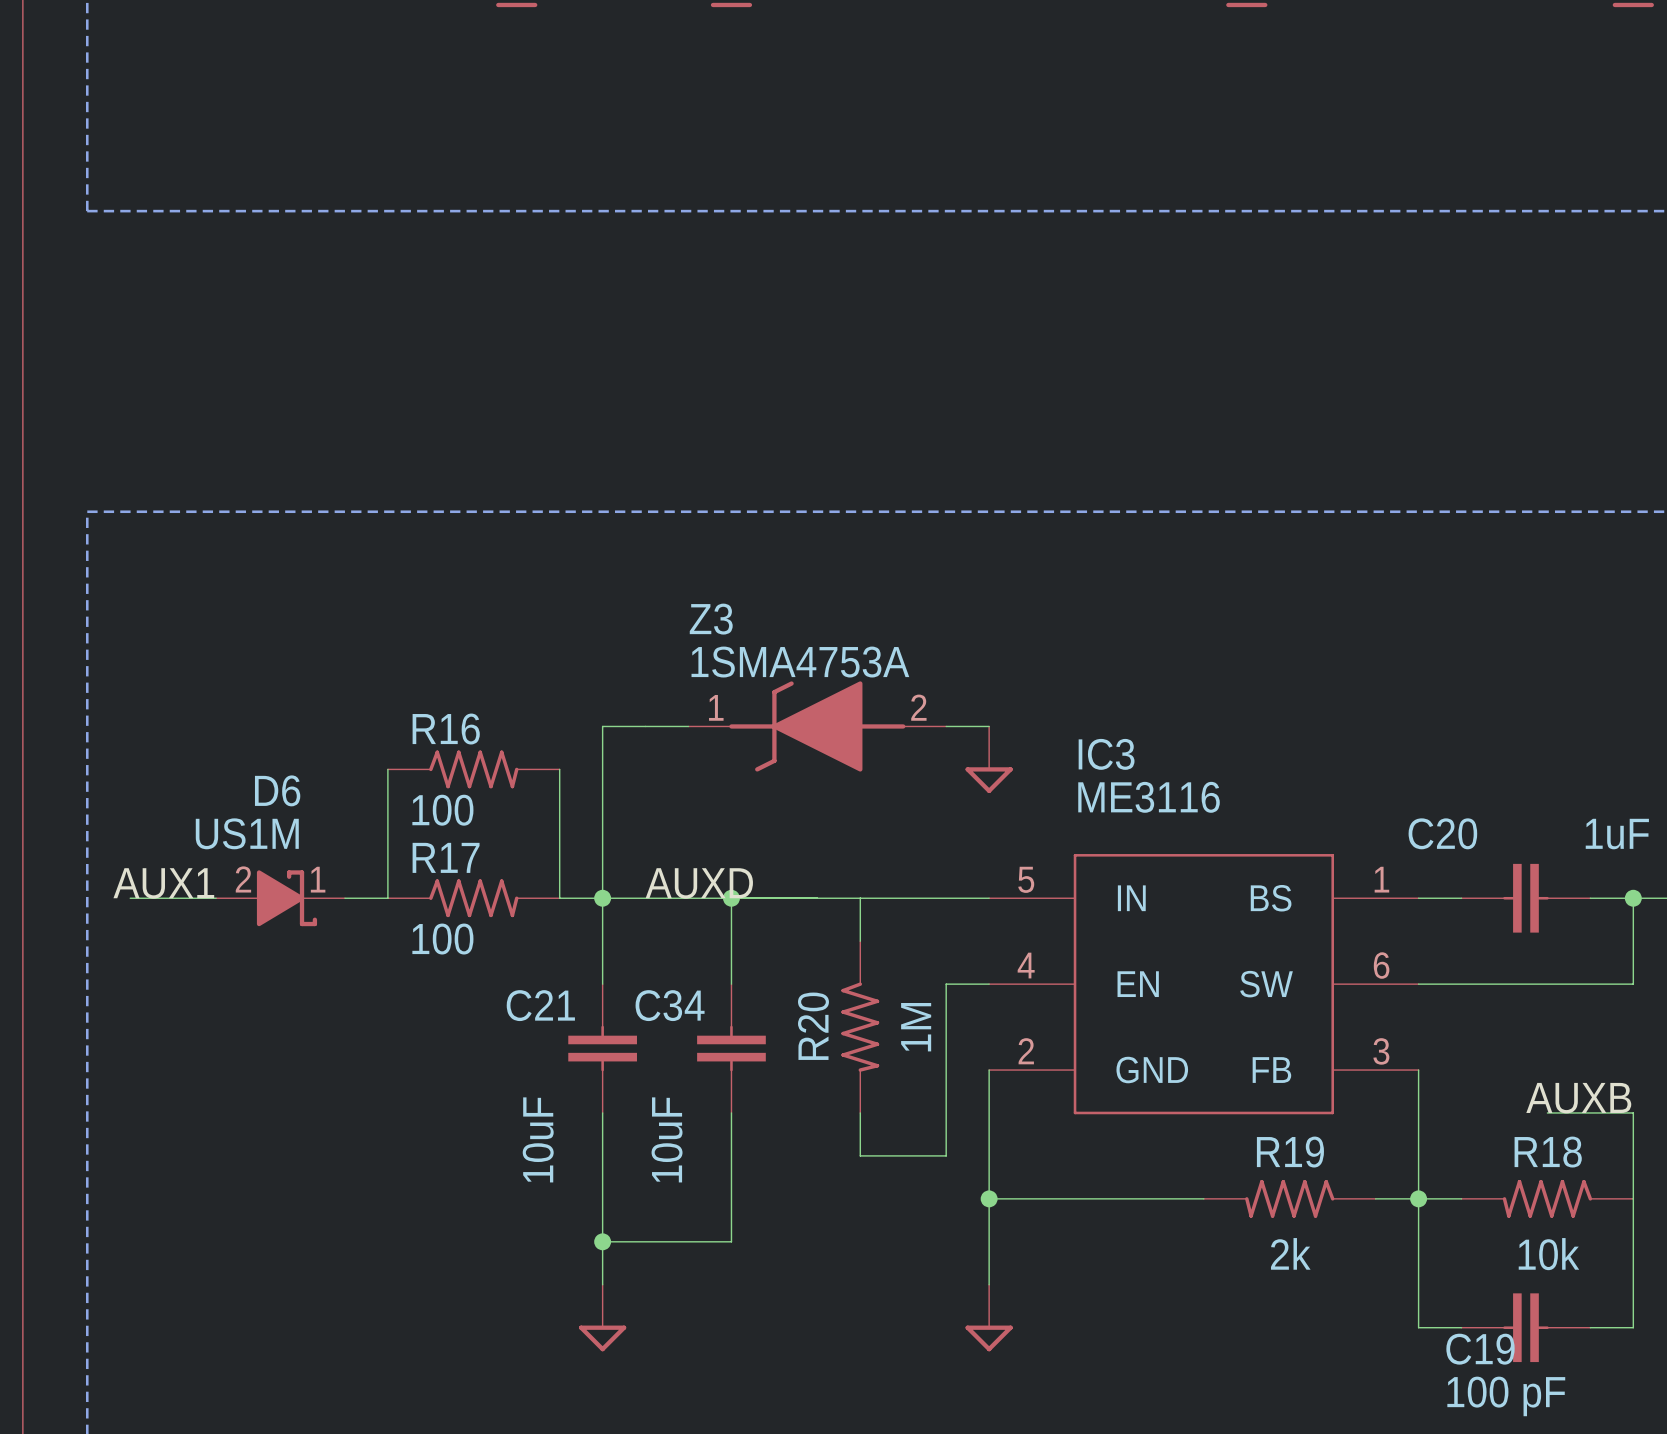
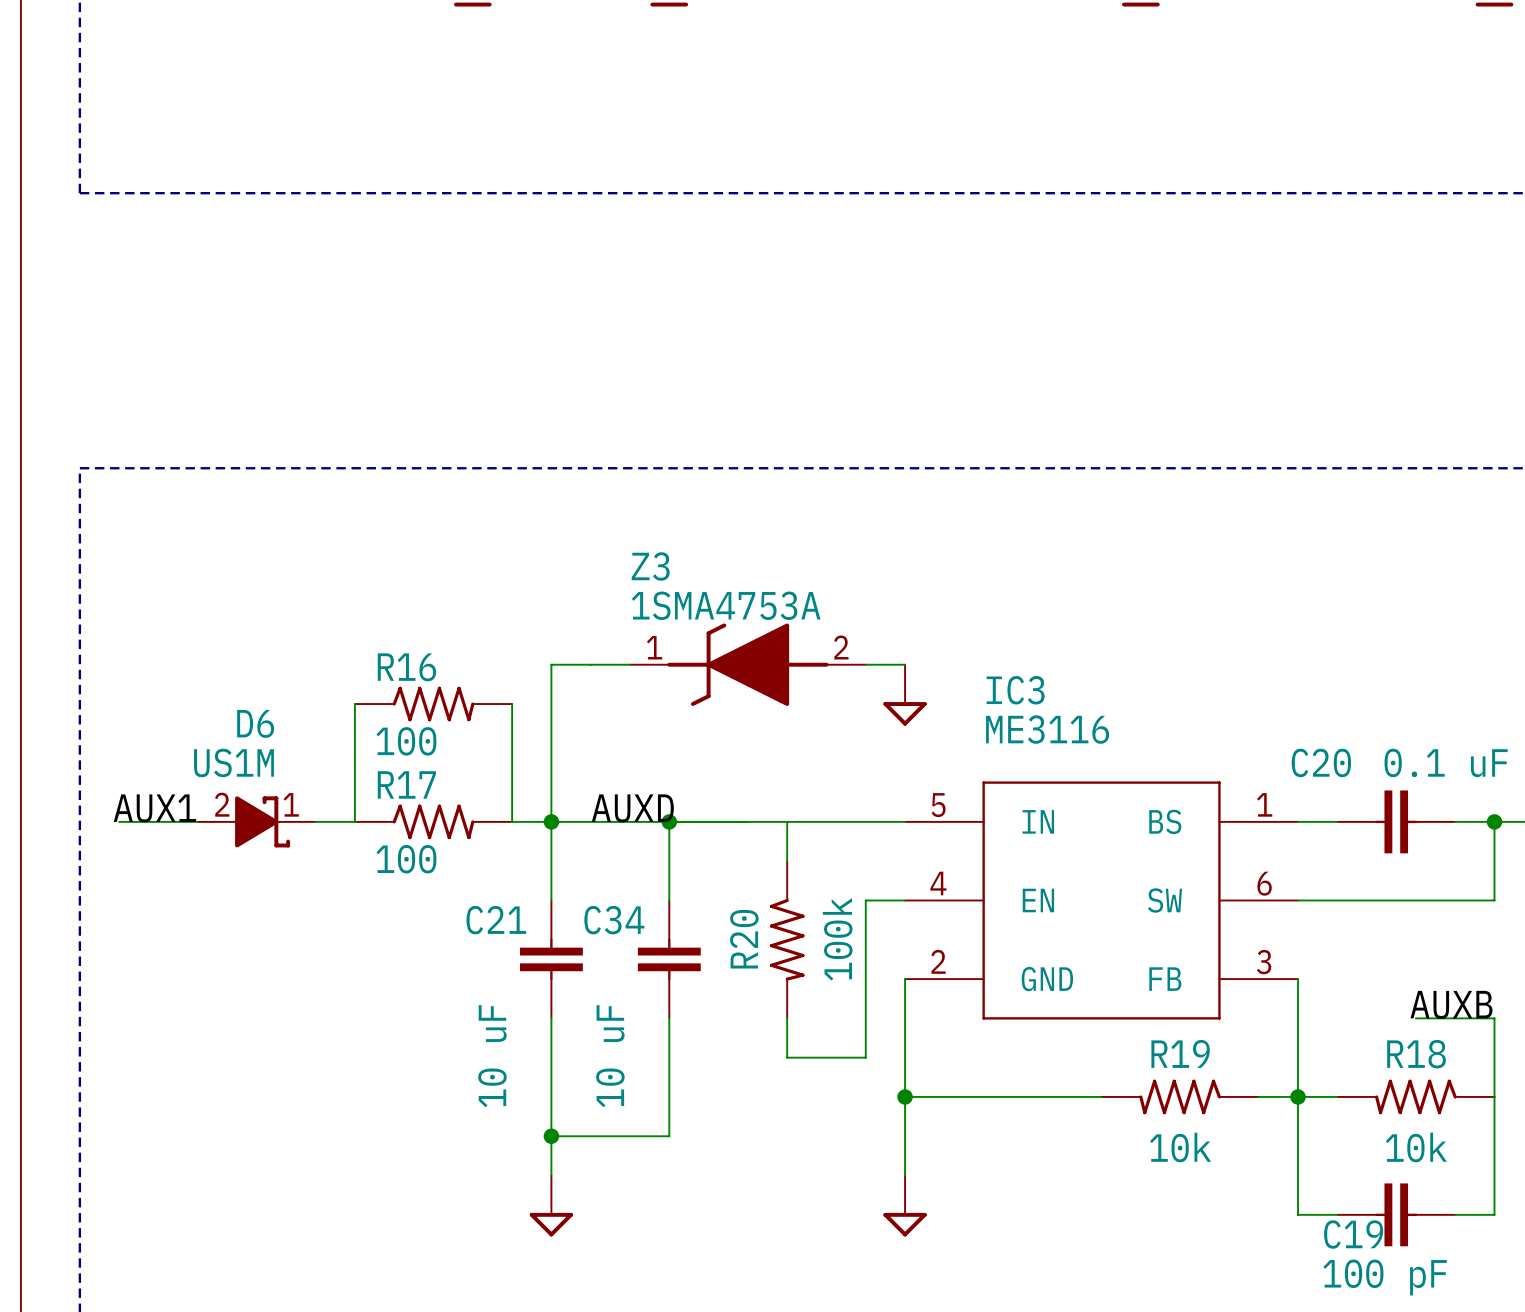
C20 value: 1uF (1617, 834) -> 0.1 uF (1446, 762)
R20 value: 1M (916, 1027) -> 100k (837, 939)
C21 value: 10uF (538, 1139) -> 10 uF (492, 1056)
C34 value: 10uF (667, 1139) -> 10 uF (610, 1056)
R19 value: 2k (1290, 1253) -> 10k (1180, 1147)

